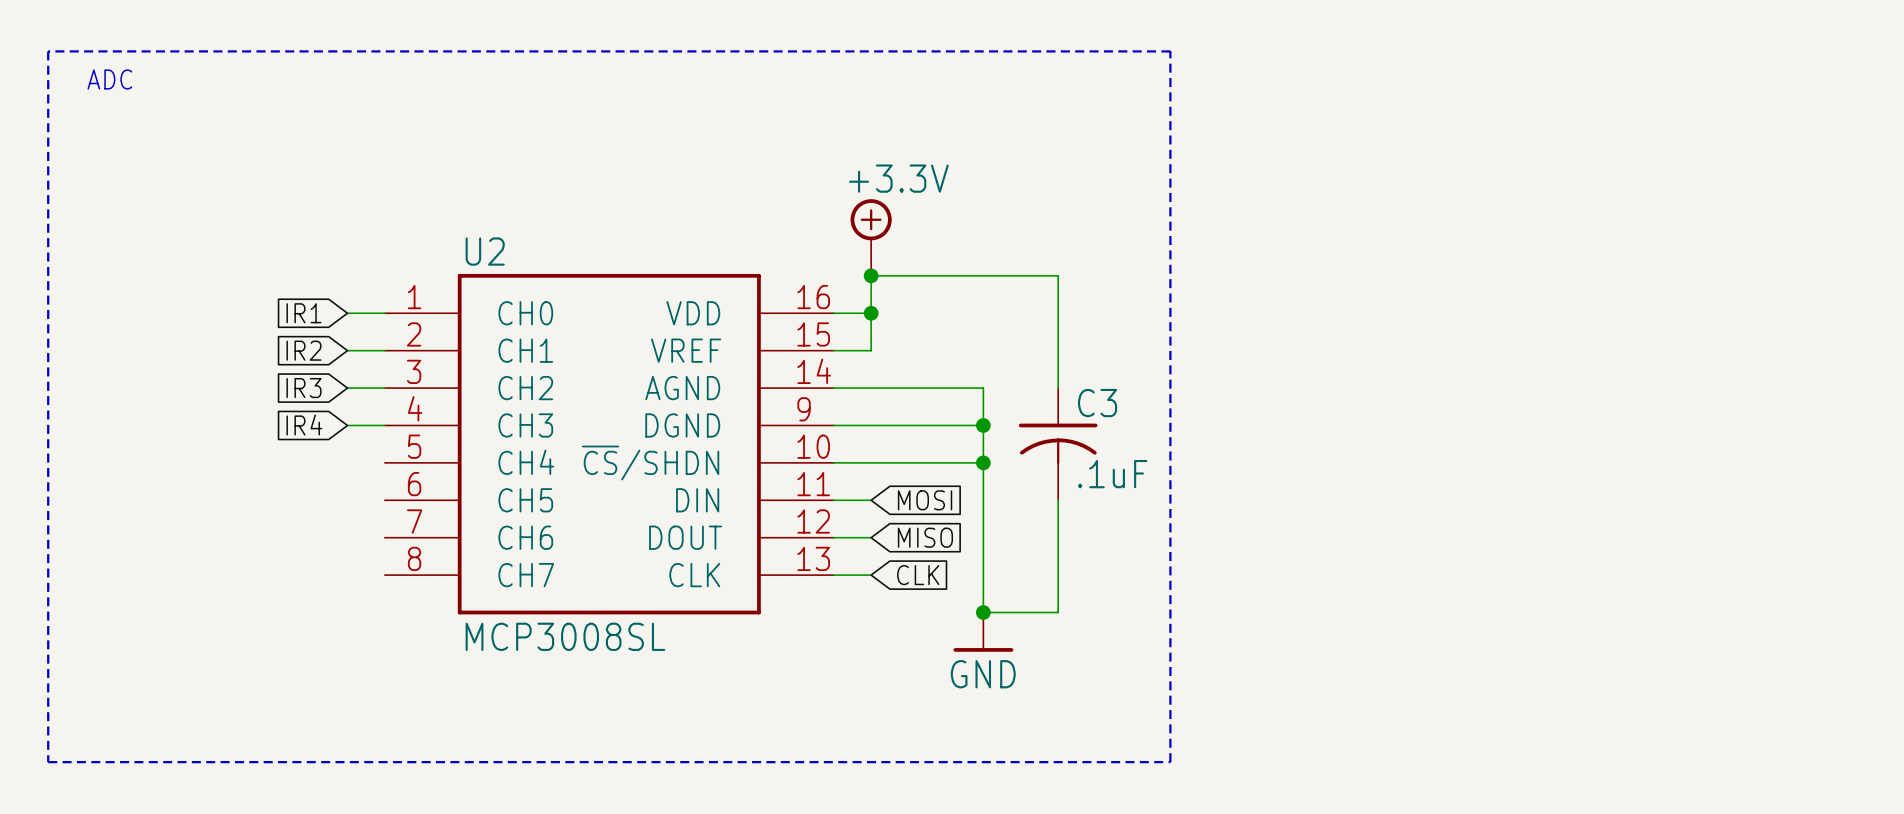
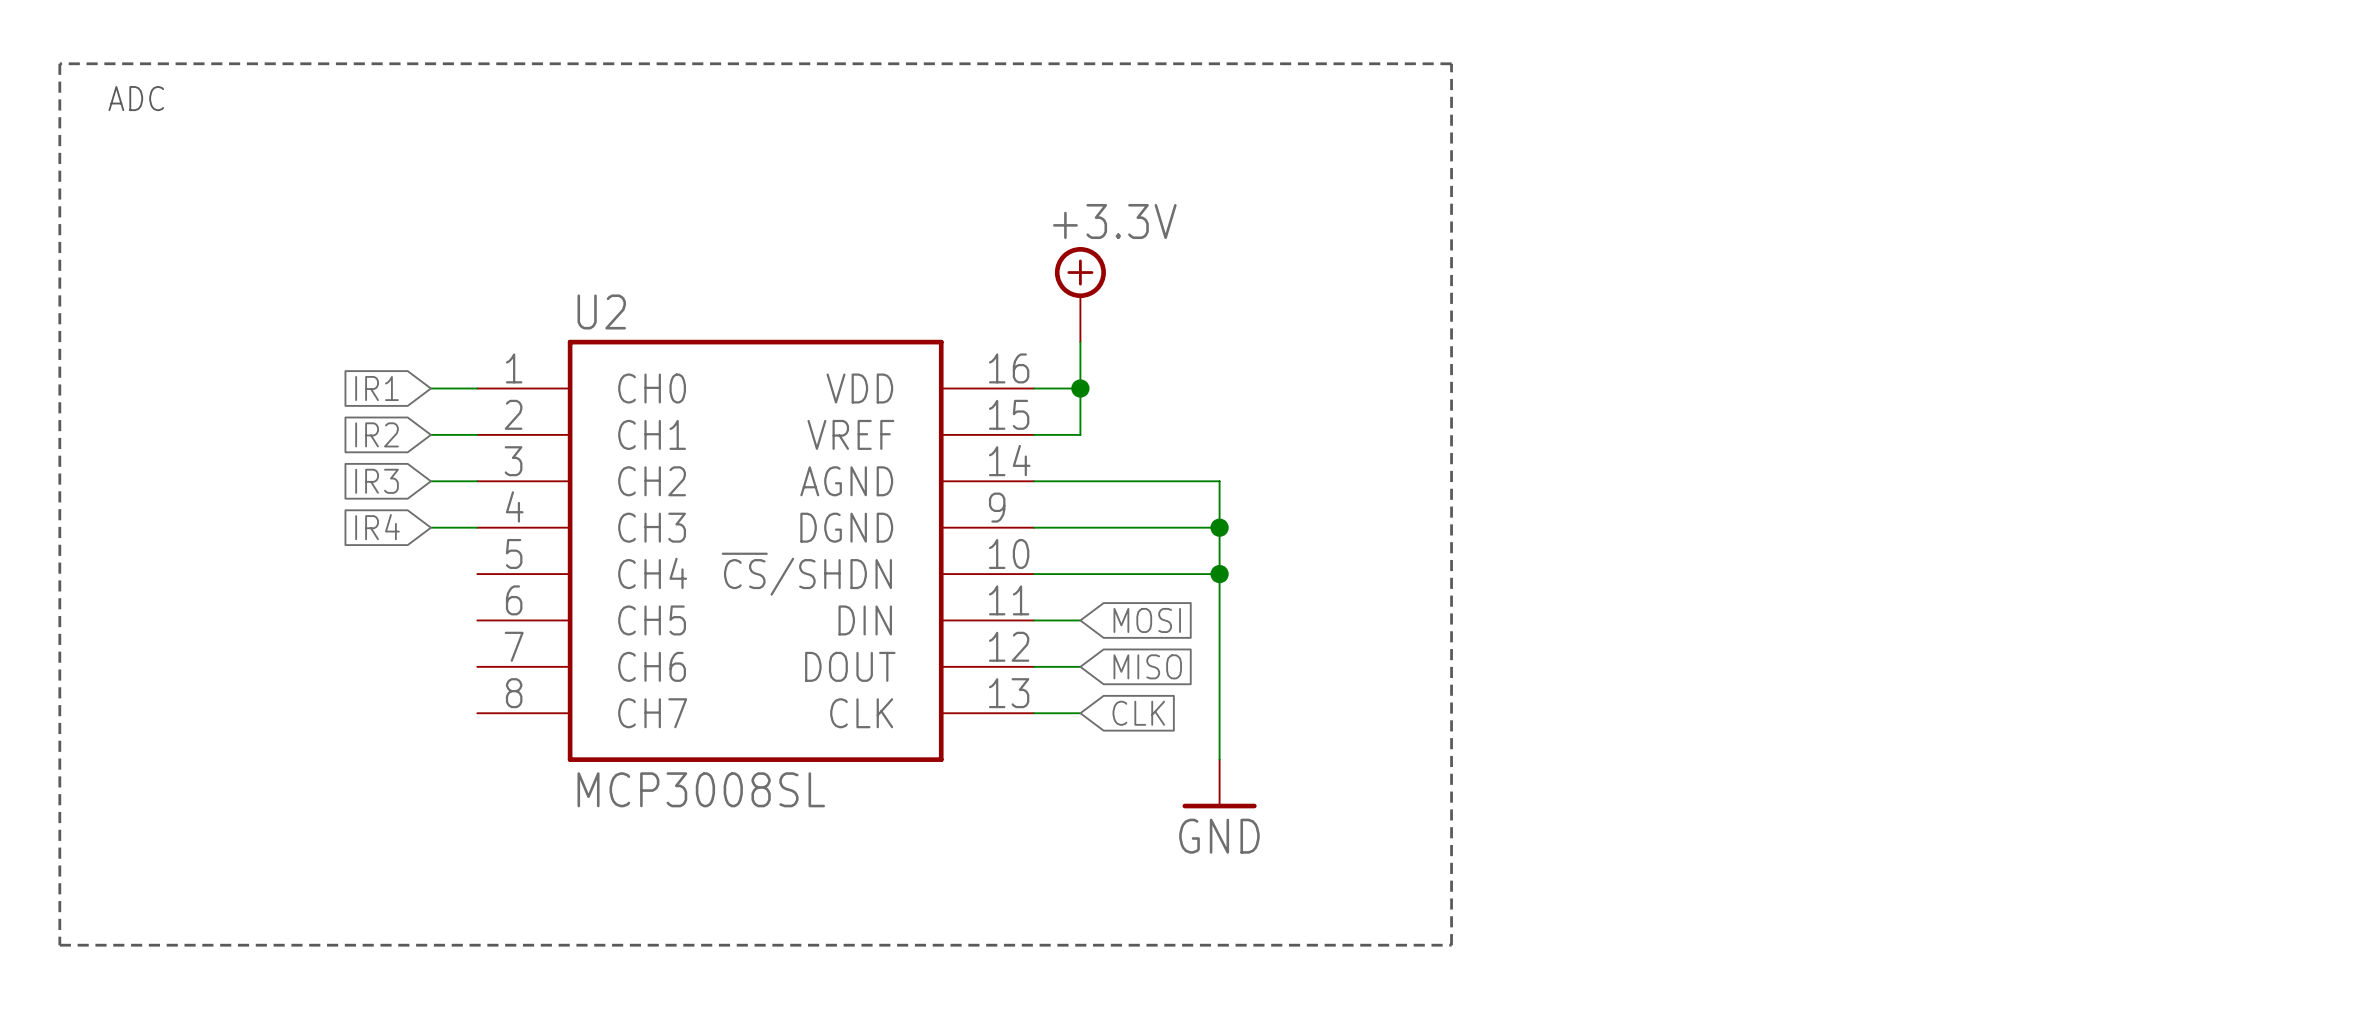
wire: (871, 275) (1058, 275) (1058, 388) -> none
junction: (871, 275) -> none
C3: .1uF (1058, 444) -> none
wire: (1058, 500) (1058, 612) (983, 612) -> none
junction: (983, 612) -> none

